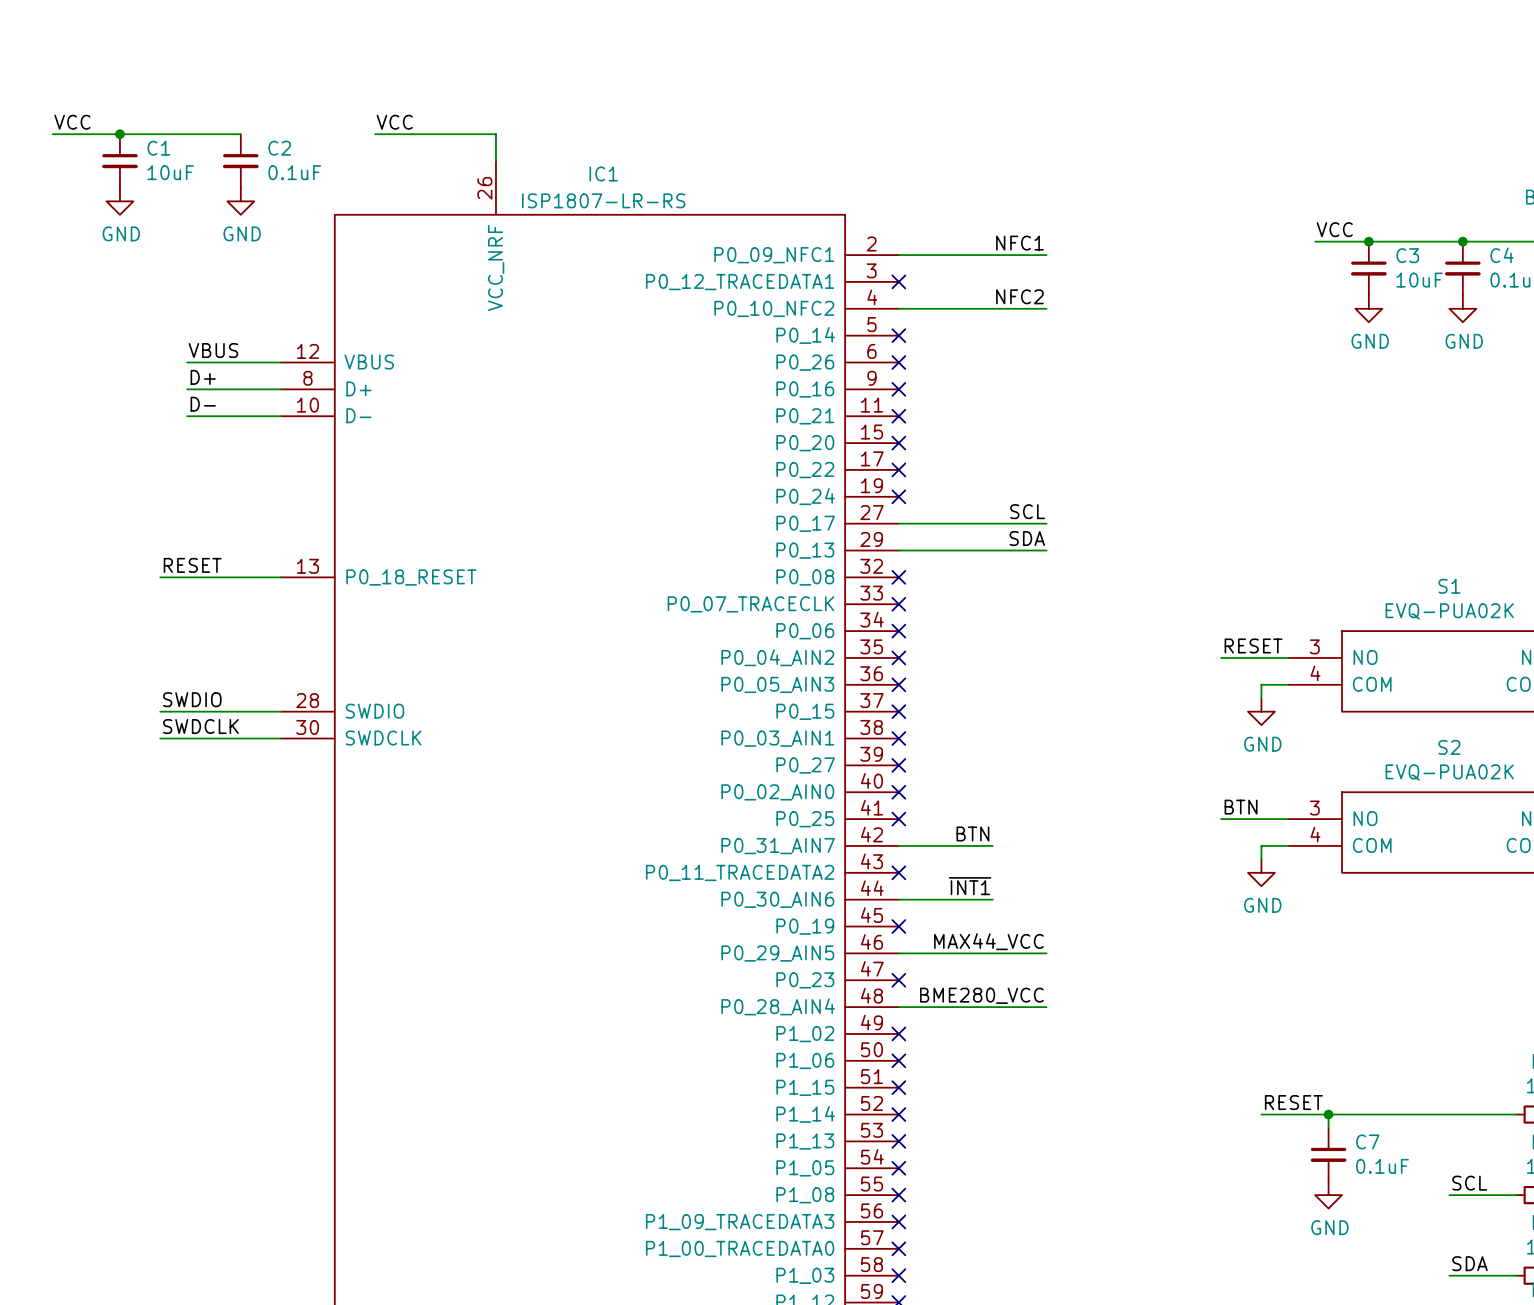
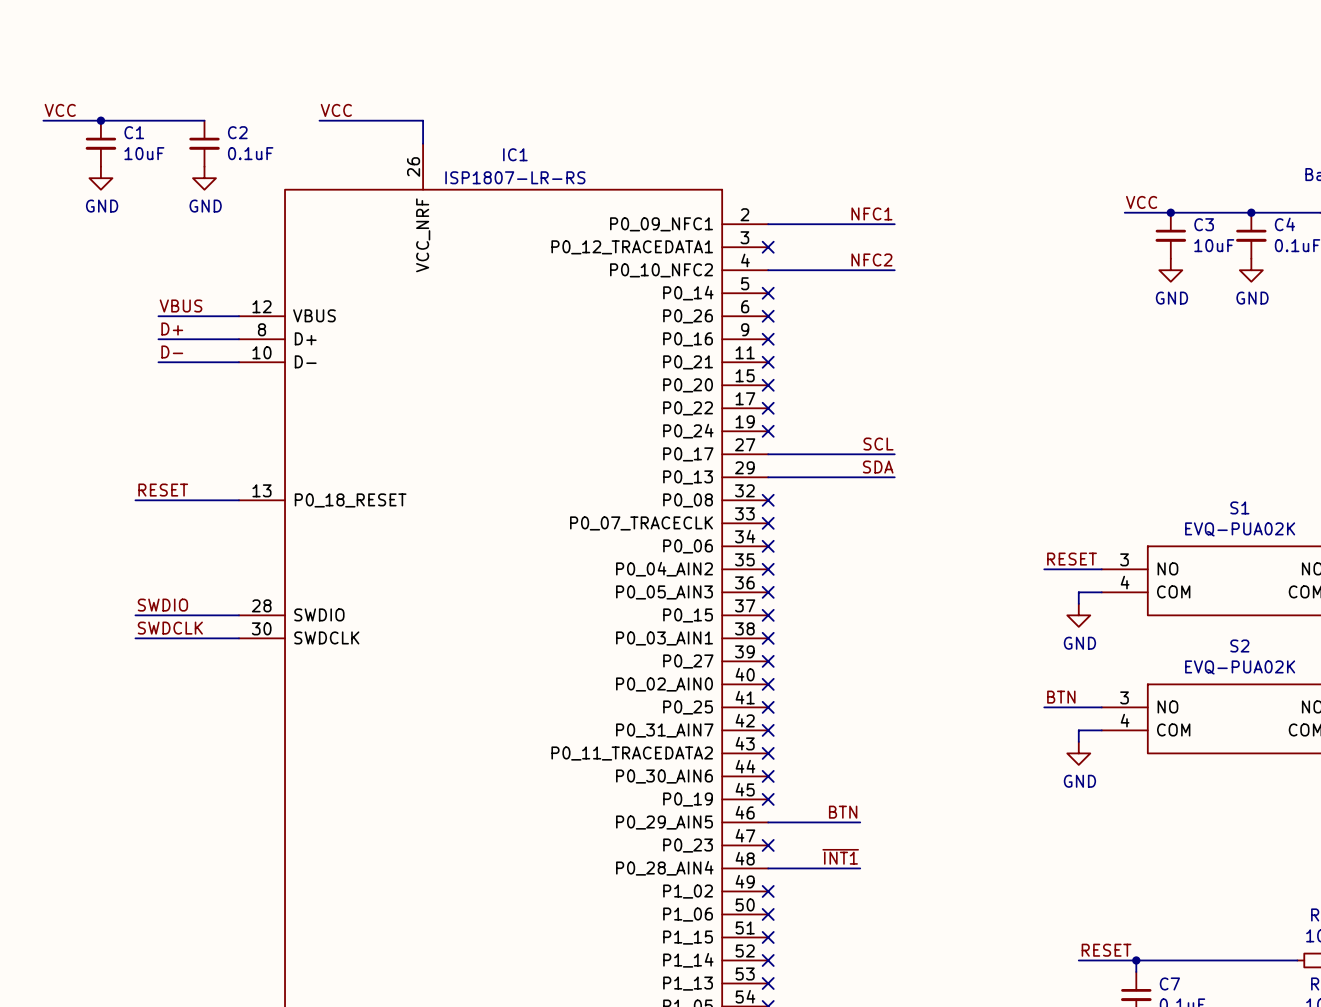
label position: BTN (972, 833) -> BTN (843, 812)
wire: (898, 845) (992, 845) -> none
no-connect mark: none -> (768, 730)
label position: ~{INT1} (970, 886) -> ~{INT1} (840, 856)
wire: (898, 899) (992, 899) -> none
no-connect mark: none -> (768, 776)
label: MAX44_VCC (988, 941) -> none
wire: (1006, 953) (1046, 953) -> none
label: BME280_VCC (981, 995) -> none
wire: (1006, 1007) (1046, 1007) -> none

